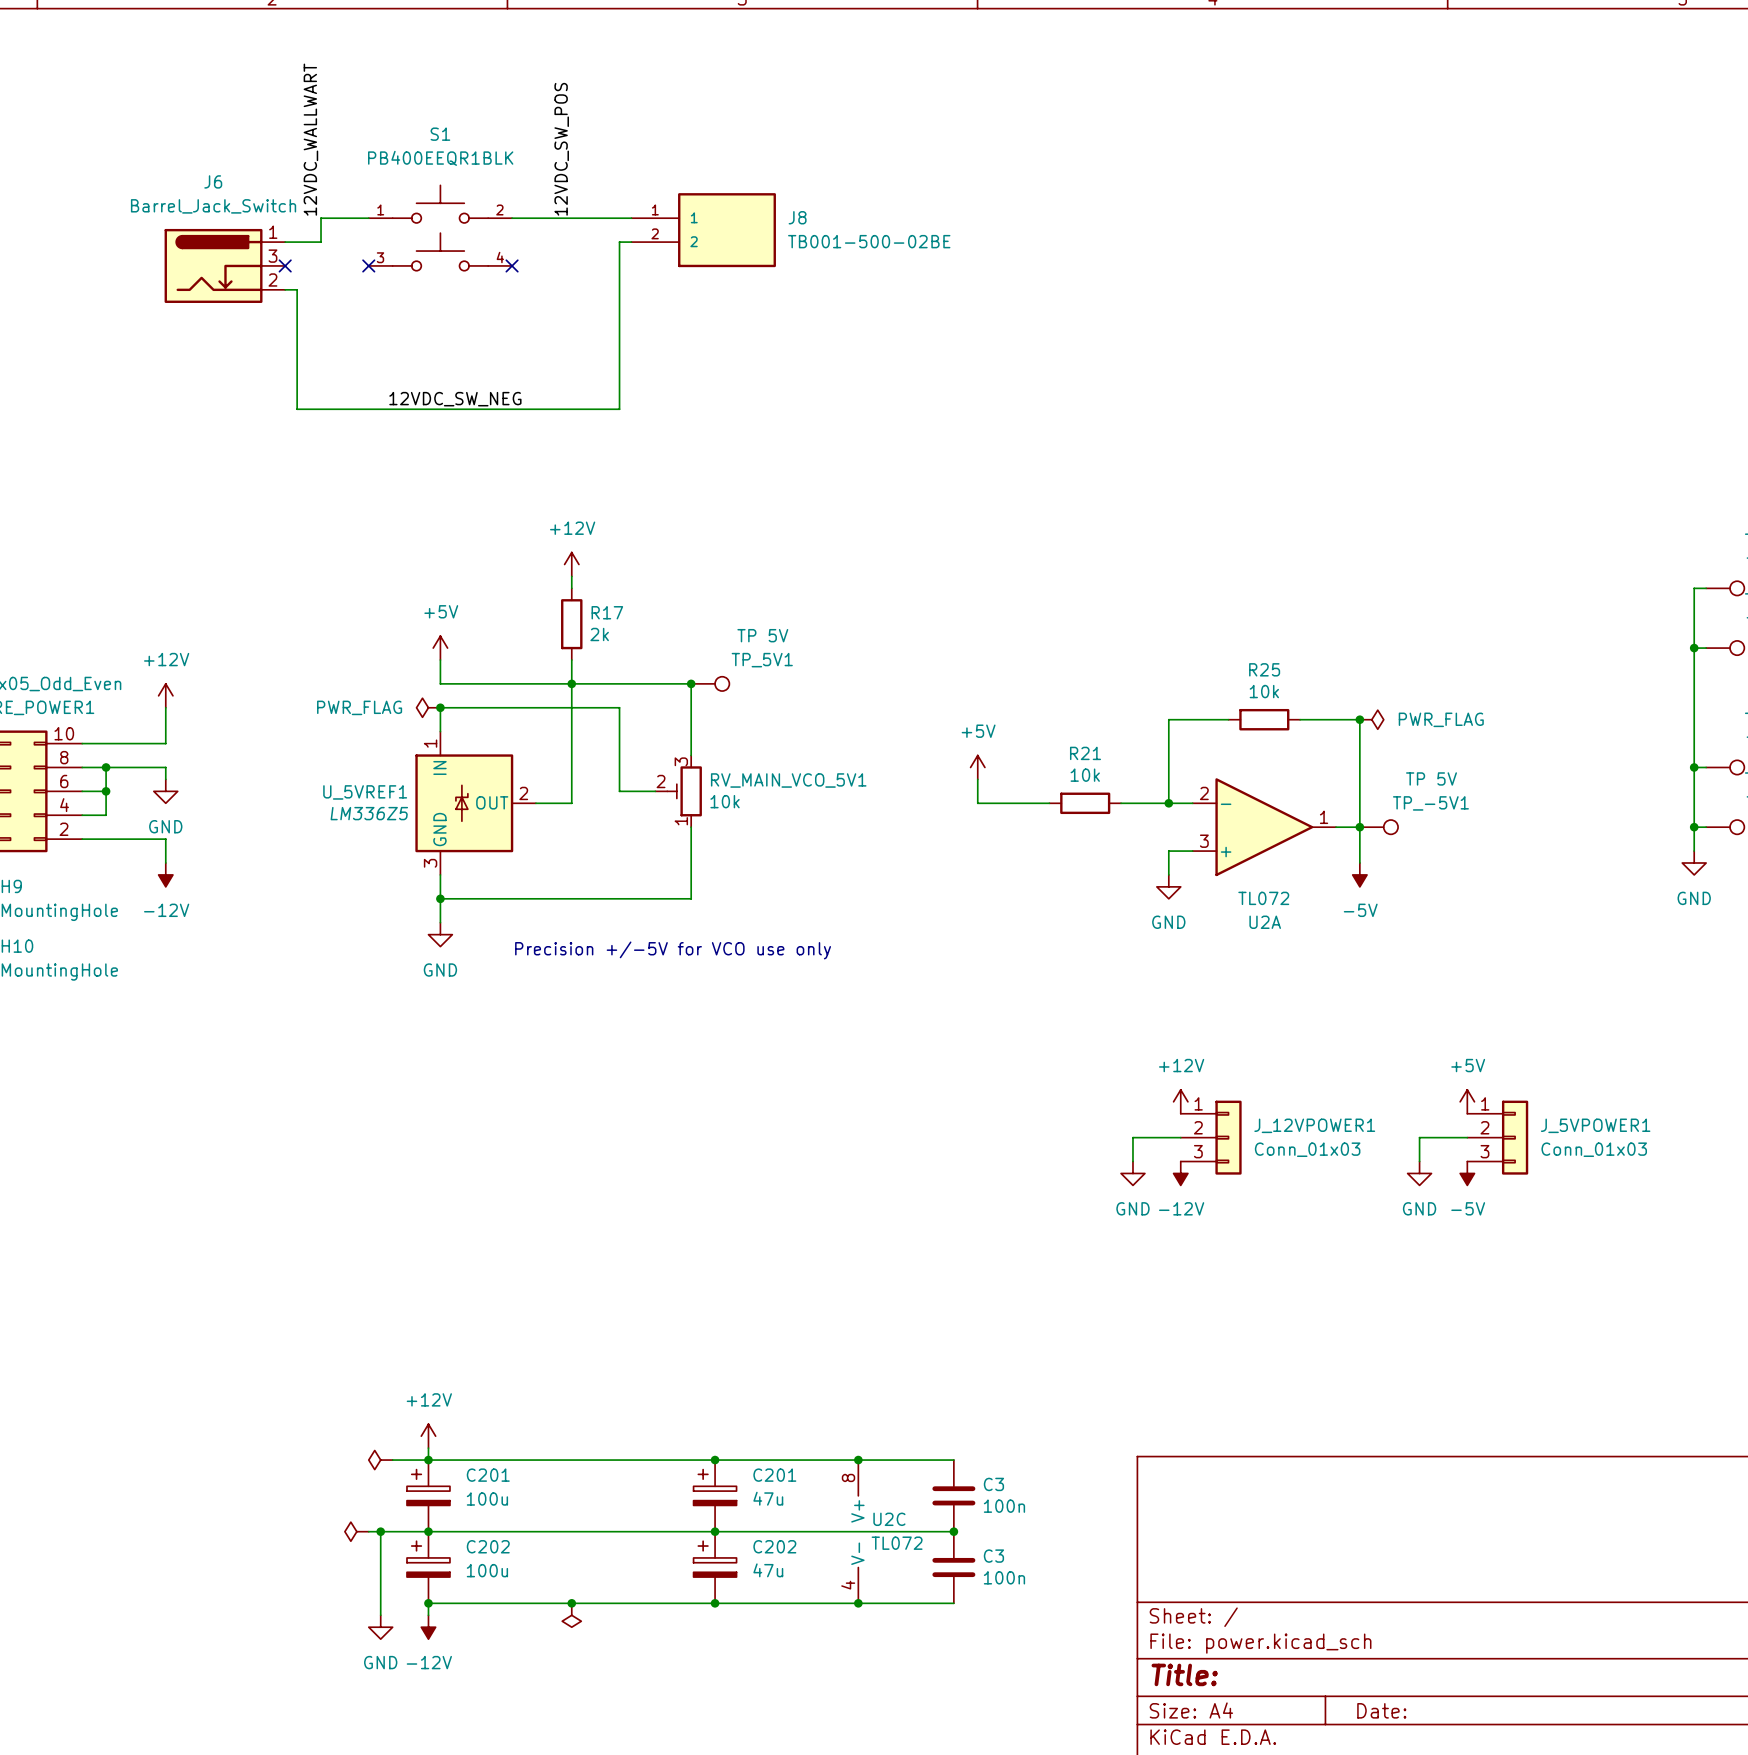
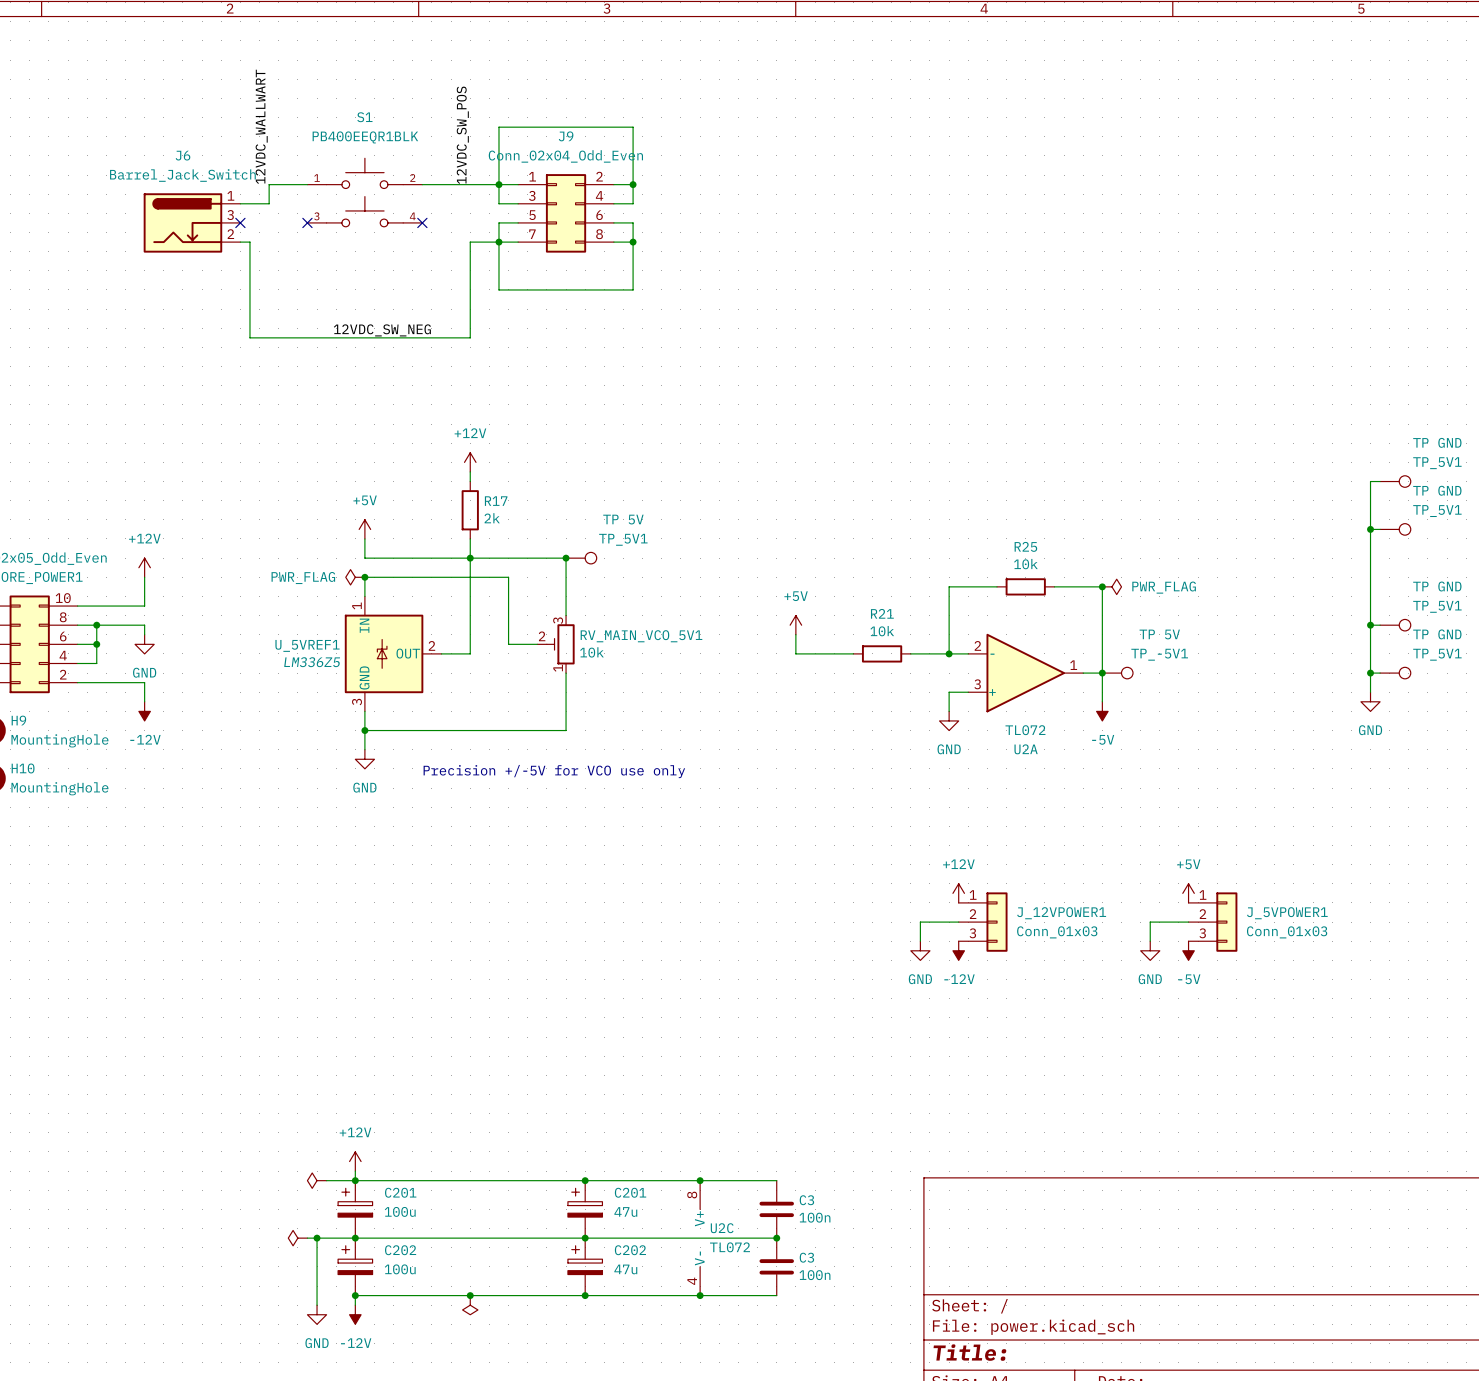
junction: none -> (498, 184)
junction: none -> (633, 184)
J8: TB001-500-02BE (703, 230) -> none
wire: (619, 242) (619, 409) (571, 409) -> (518, 242) (470, 242) (470, 337)
wire: none -> (508, 203) (498, 203) (498, 127) (633, 127) (633, 203) (613, 203)
J9: none -> Conn_02x04_Odd_Even (566, 213)
wire: none -> (518, 222) (498, 222) (498, 289) (633, 289) (633, 222) (613, 222)
junction: none -> (498, 242)
wire: none -> (613, 242) (633, 242)
junction: none -> (633, 242)

